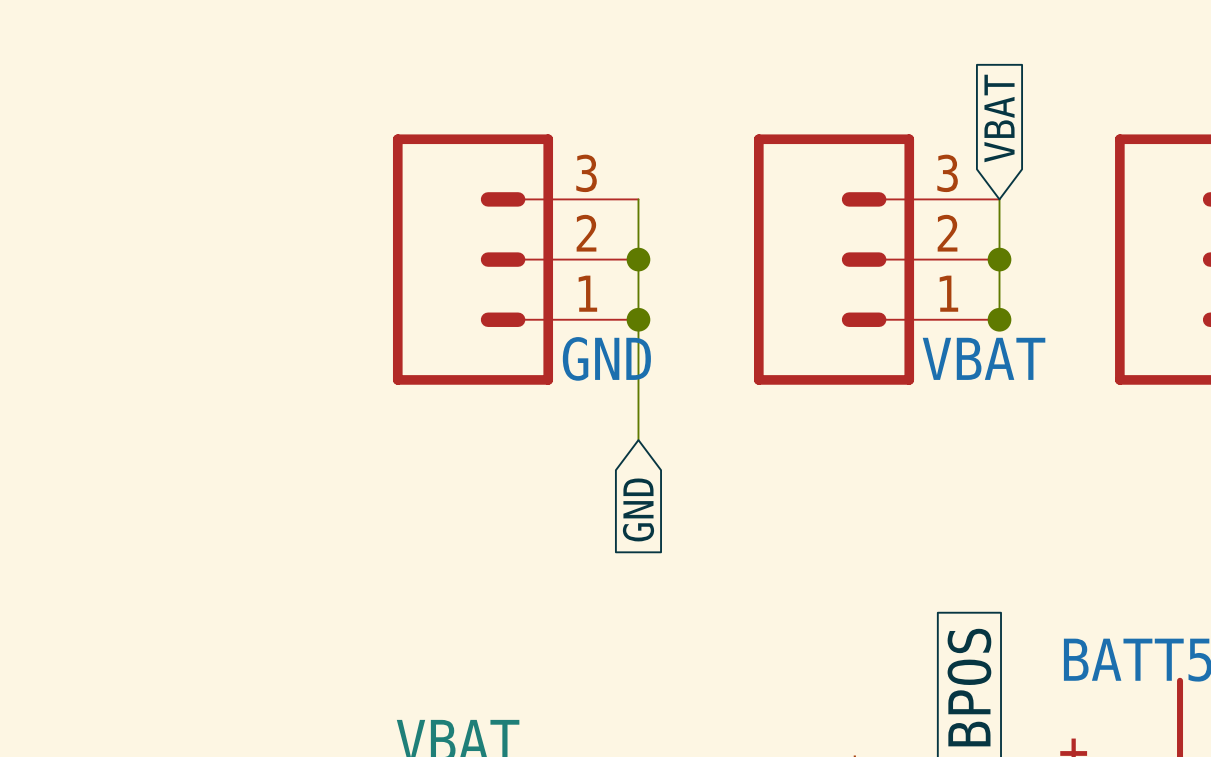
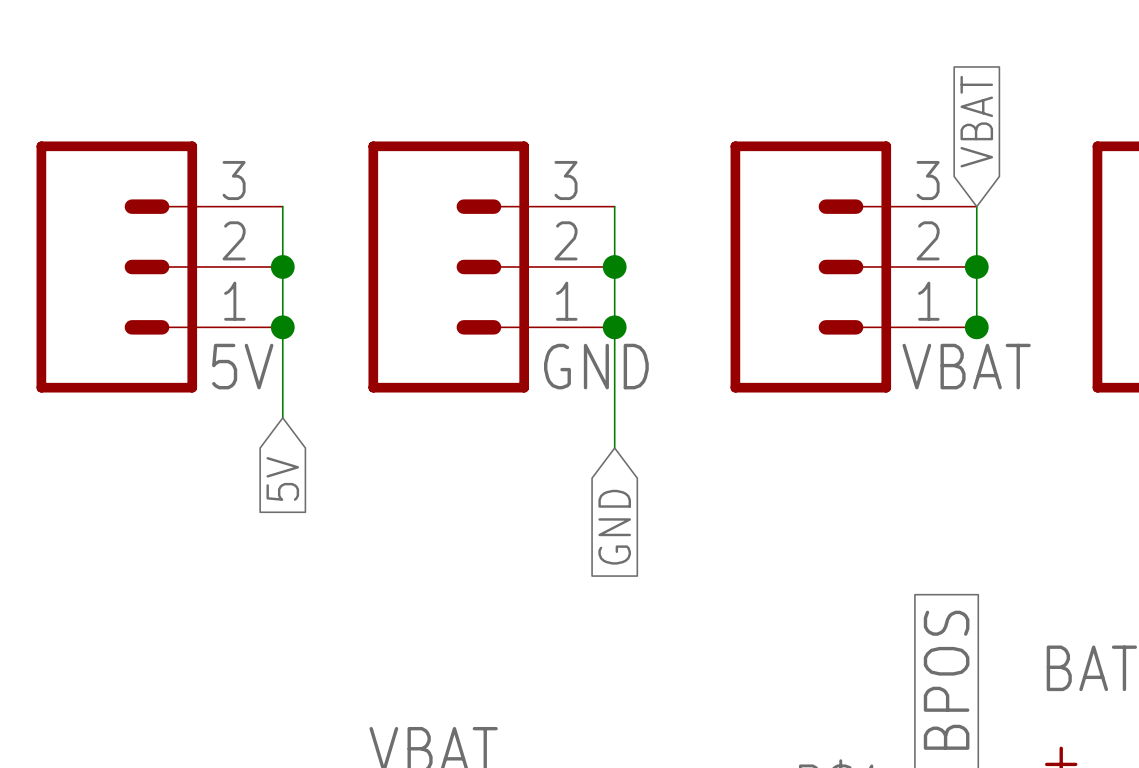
wire: none -> (282, 206) (282, 417)
5V: none -> (159, 266)
junction: none -> (282, 266)
junction: none -> (282, 327)
global label: none -> 5V (282, 478)

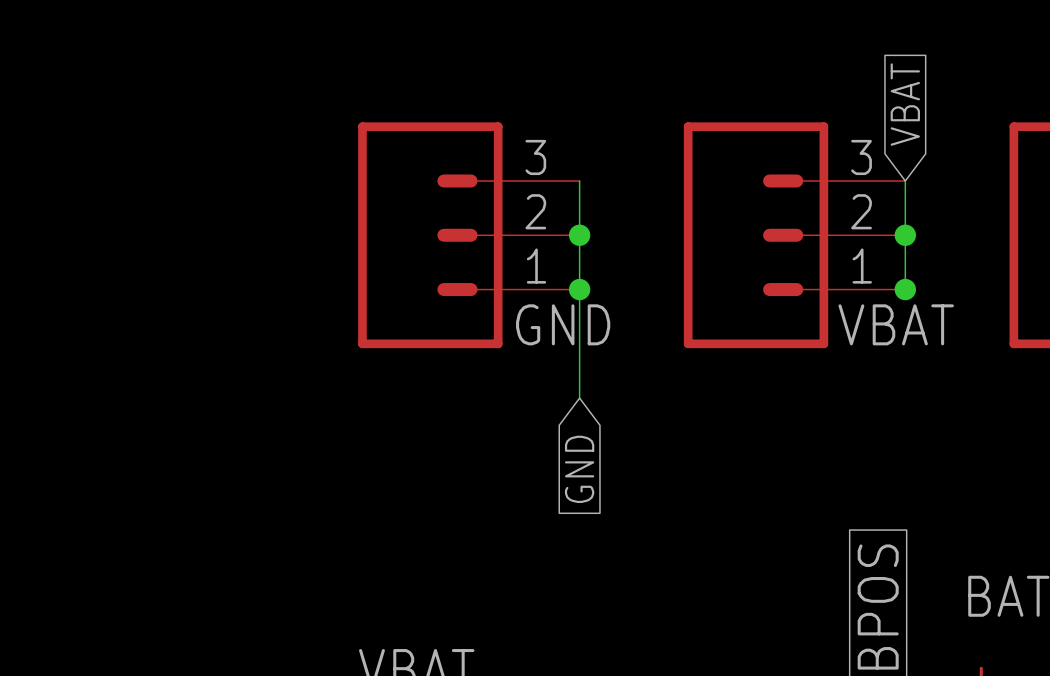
wire: (282, 206) (282, 417) -> none
5V: (159, 266) -> none
junction: (282, 266) -> none
junction: (282, 327) -> none
global label: 5V (282, 478) -> none

